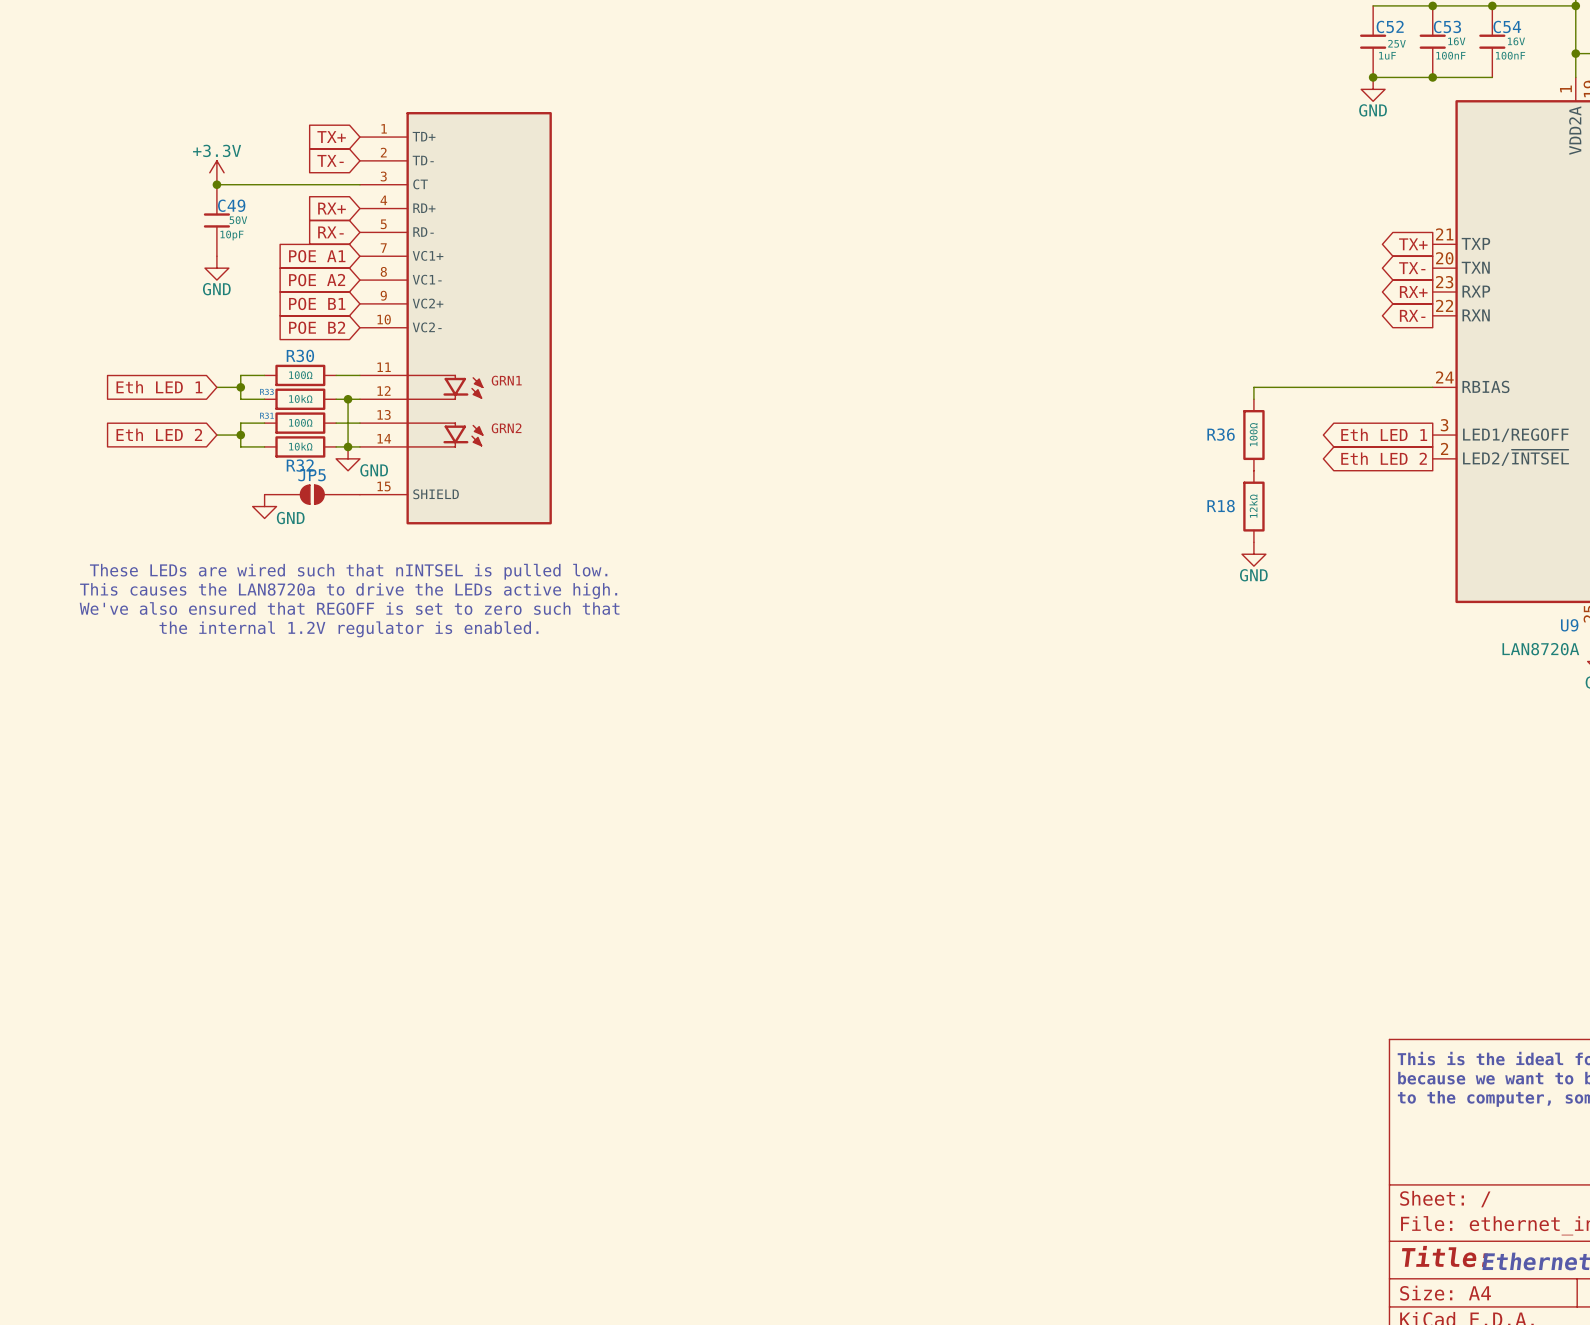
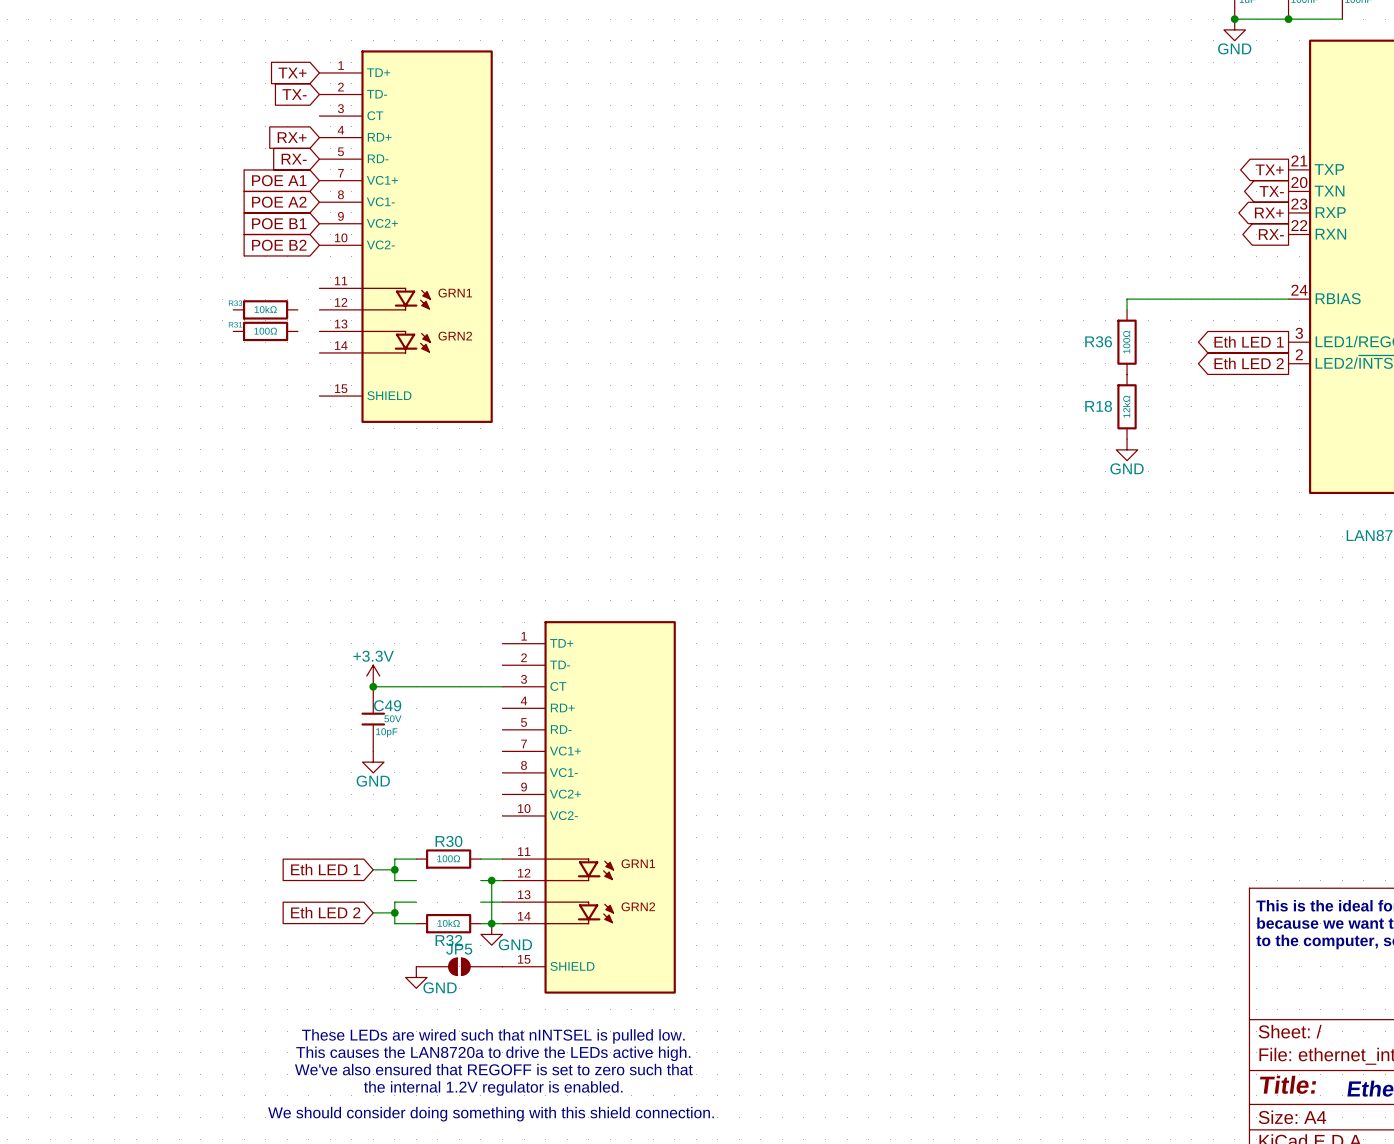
power symbol: +3.3V (216, 172) -> none
wire: (216, 184) (359, 184) -> none
junction: (216, 184) -> none
C49 position: (216, 220) -> (373, 719)
power symbol: GND (216, 268) -> none
wire: (264, 375) (240, 375) (240, 399) (264, 399) -> none
R30 position: (300, 375) -> (448, 859)
wire: (336, 375) (359, 375) -> none
global label: Eth LED 1 (159, 387) -> none
wire: (216, 387) (240, 387) -> none
junction: (240, 387) -> none
wire: (336, 399) (359, 399) -> none
wire: (348, 399) (348, 446) -> none
junction: (348, 399) -> none
wire: (264, 423) (240, 423) (240, 446) (264, 446) -> none
wire: (336, 423) (359, 423) -> none
global label: Eth LED 2 (159, 434) -> none
wire: (216, 435) (240, 435) -> none
junction: (240, 435) -> none
R32 position: (300, 446) -> (448, 923)
wire: (336, 446) (359, 446) -> none
junction: (348, 446) -> none
power symbol: GND (348, 458) -> none
JP5 position: (312, 494) -> (459, 966)
power symbol: GND (264, 506) -> none
text: These LEDs are wired such that nINTSEL is pulled low. (348, 571) -> none
text: This causes the LAN8720a to drive the LEDs active high. (348, 591) -> none
text: We've also ensured that REGOFF is set to zero such that (349, 608) -> none
text: the internal 1.2V regulator is enabled. (348, 629) -> none
power symbol: none -> +3.3V (373, 676)
wire: none -> (373, 686) (502, 686)
junction: none -> (373, 686)
power symbol: none -> GND (373, 762)
part: none -> (589, 807)
wire: none -> (416, 859) (394, 859) (394, 880) (416, 880)
wire: none -> (480, 859) (502, 859)
global label: none -> Eth LED 1 (325, 869)
wire: none -> (373, 869) (394, 869)
junction: none -> (394, 869)
wire: none -> (480, 880) (502, 880)
wire: none -> (491, 880) (491, 923)
junction: none -> (491, 880)
wire: none -> (416, 902) (394, 902) (394, 923) (416, 923)
wire: none -> (480, 902) (502, 902)
global label: none -> Eth LED 2 (325, 912)
wire: none -> (373, 912) (394, 912)
junction: none -> (394, 912)
wire: none -> (480, 923) (502, 923)
junction: none -> (491, 923)
power symbol: none -> GND (491, 934)
power symbol: none -> GND (416, 977)
text: none -> These LEDs are wired such that nINTSEL is pulled low. (493, 1036)
text: none -> This causes the LAN8720a to drive the LEDs active high. (493, 1053)
text: none -> We've also ensured that REGOFF is set to zero such that (493, 1069)
text: none -> the internal 1.2V regulator is enabled. (493, 1088)
text: none -> We should consider doing something with this shield connection. (491, 1114)

